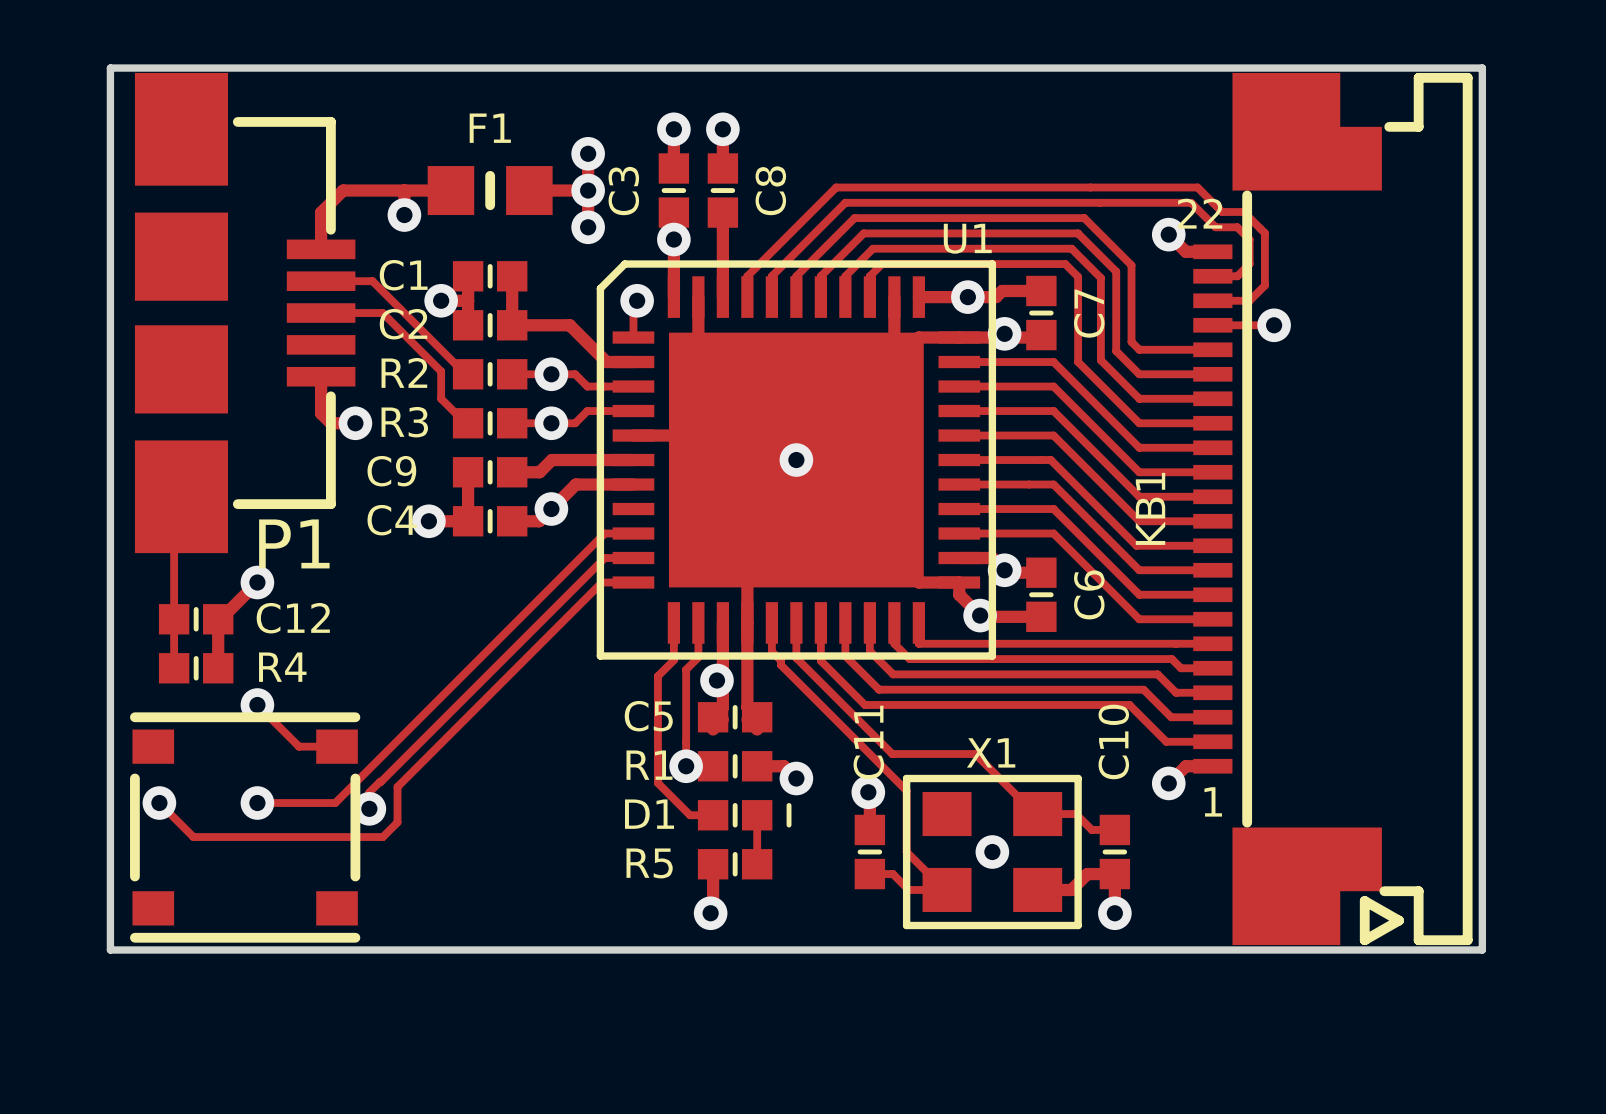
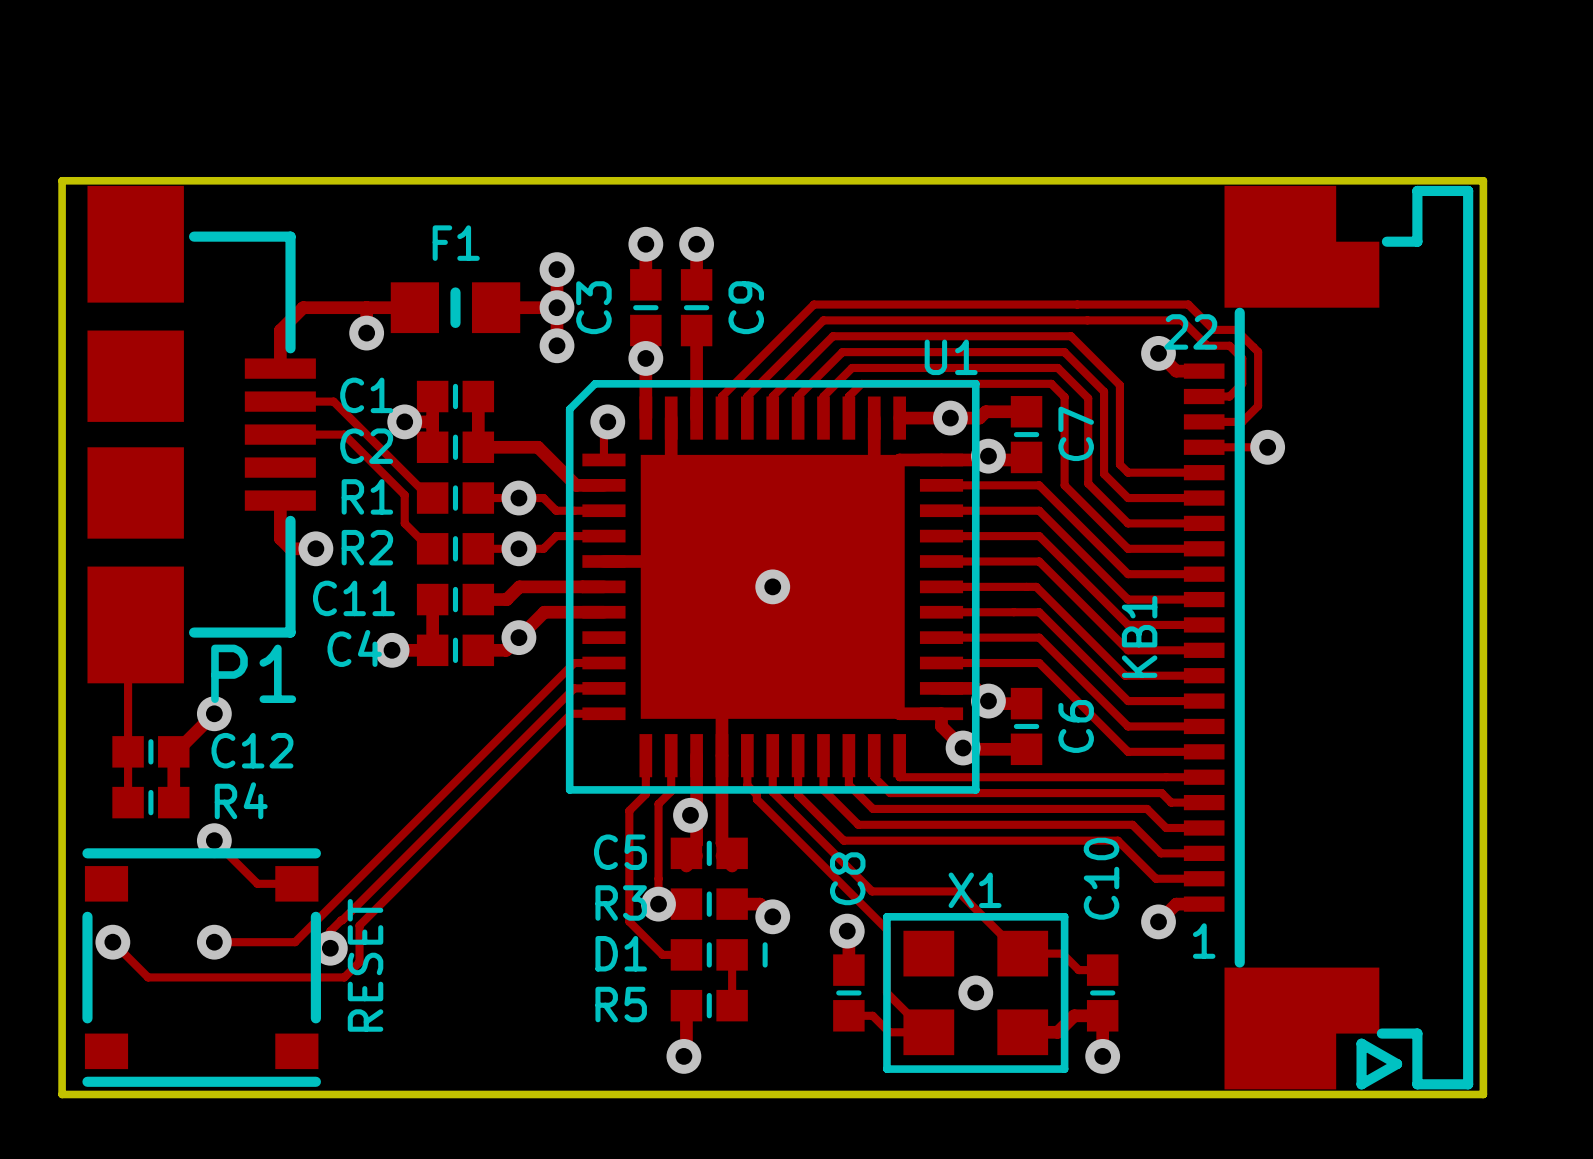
C8 name: C8 (770, 190) -> C9 (746, 307)
R2 name: R2 (404, 372) -> R1 (367, 496)
R3 name: R3 (404, 422) -> R2 (367, 547)
C9 name: C9 (391, 471) -> C11 (353, 598)
C11 name: C11 (868, 742) -> C8 (847, 878)
R1 name: R1 (649, 765) -> R3 (621, 902)
part value: none -> RESET (365, 965)

